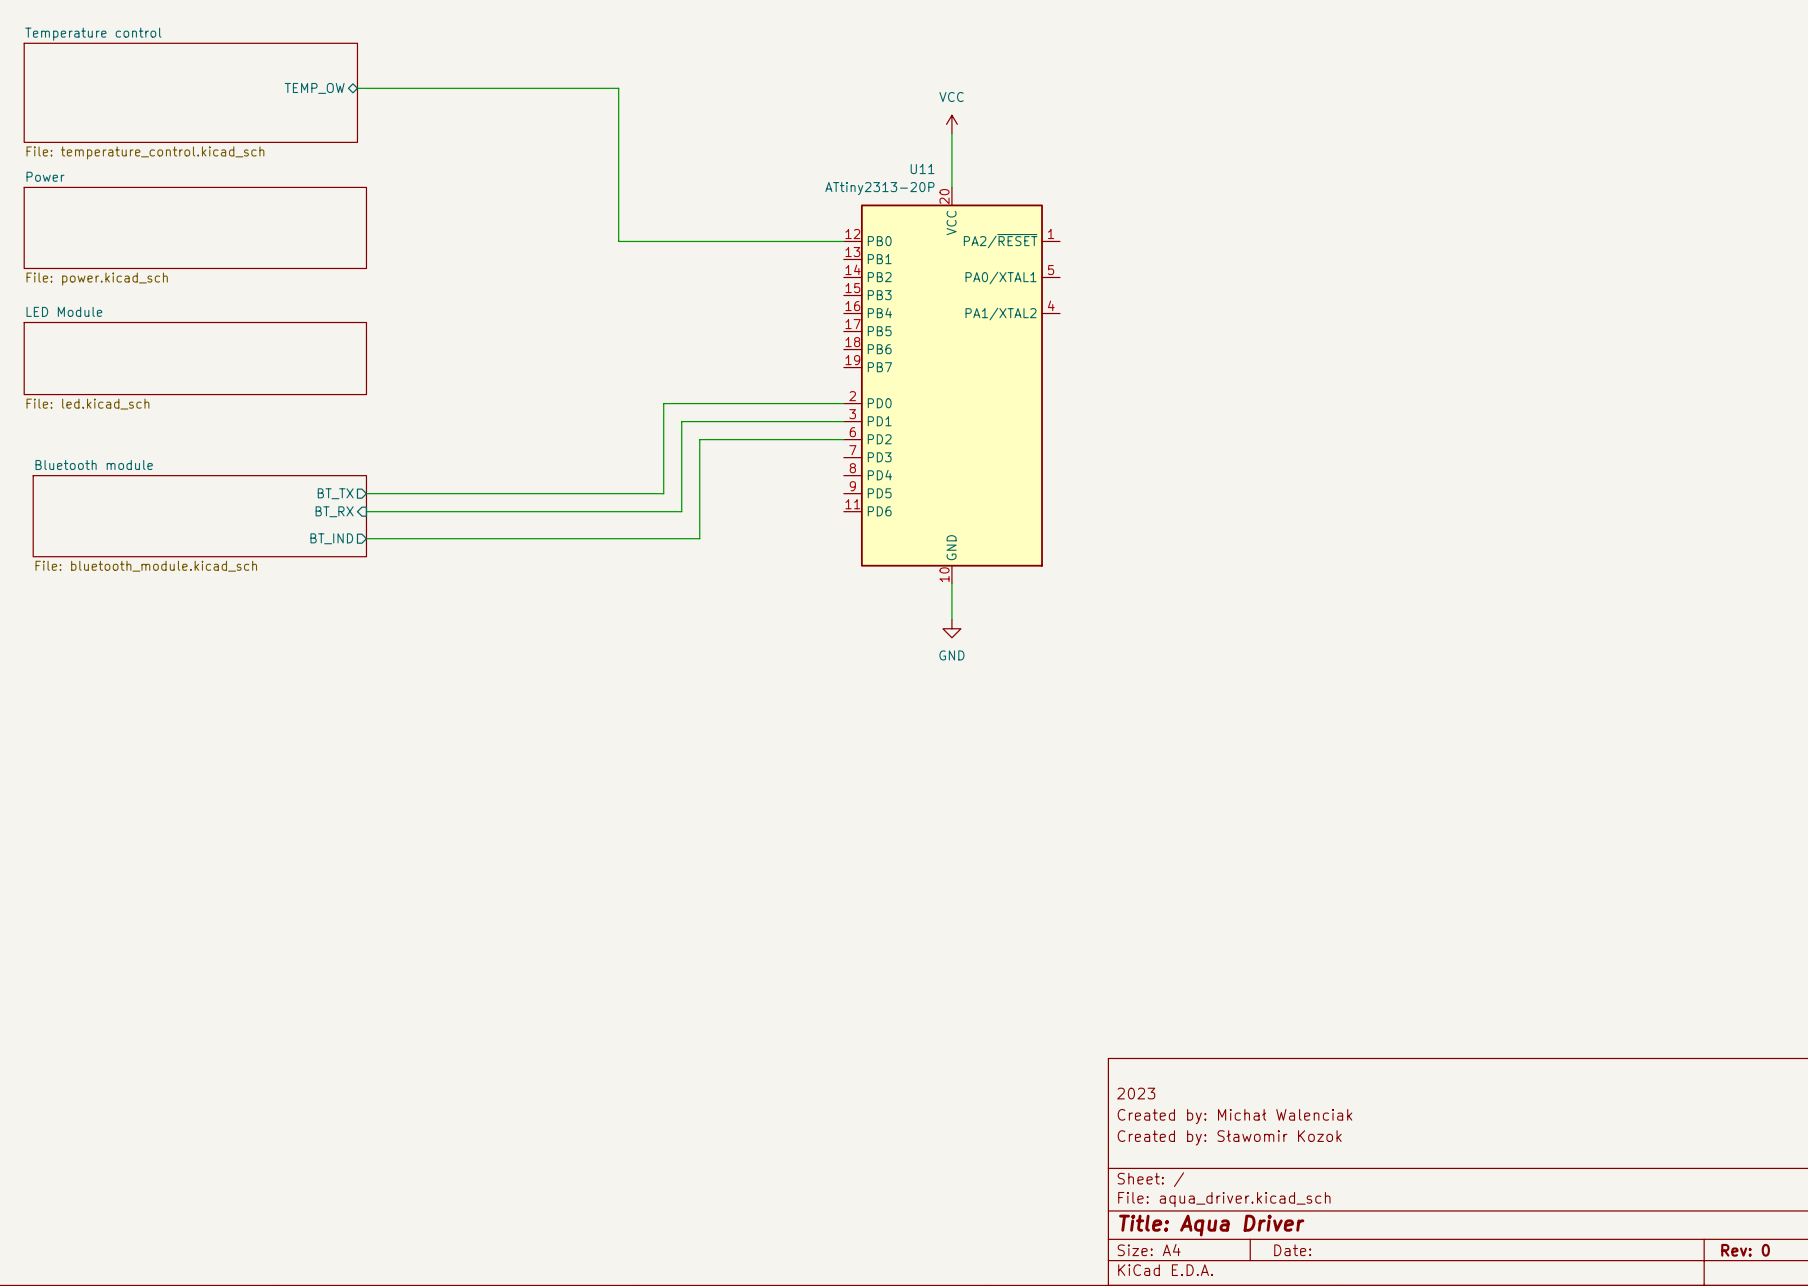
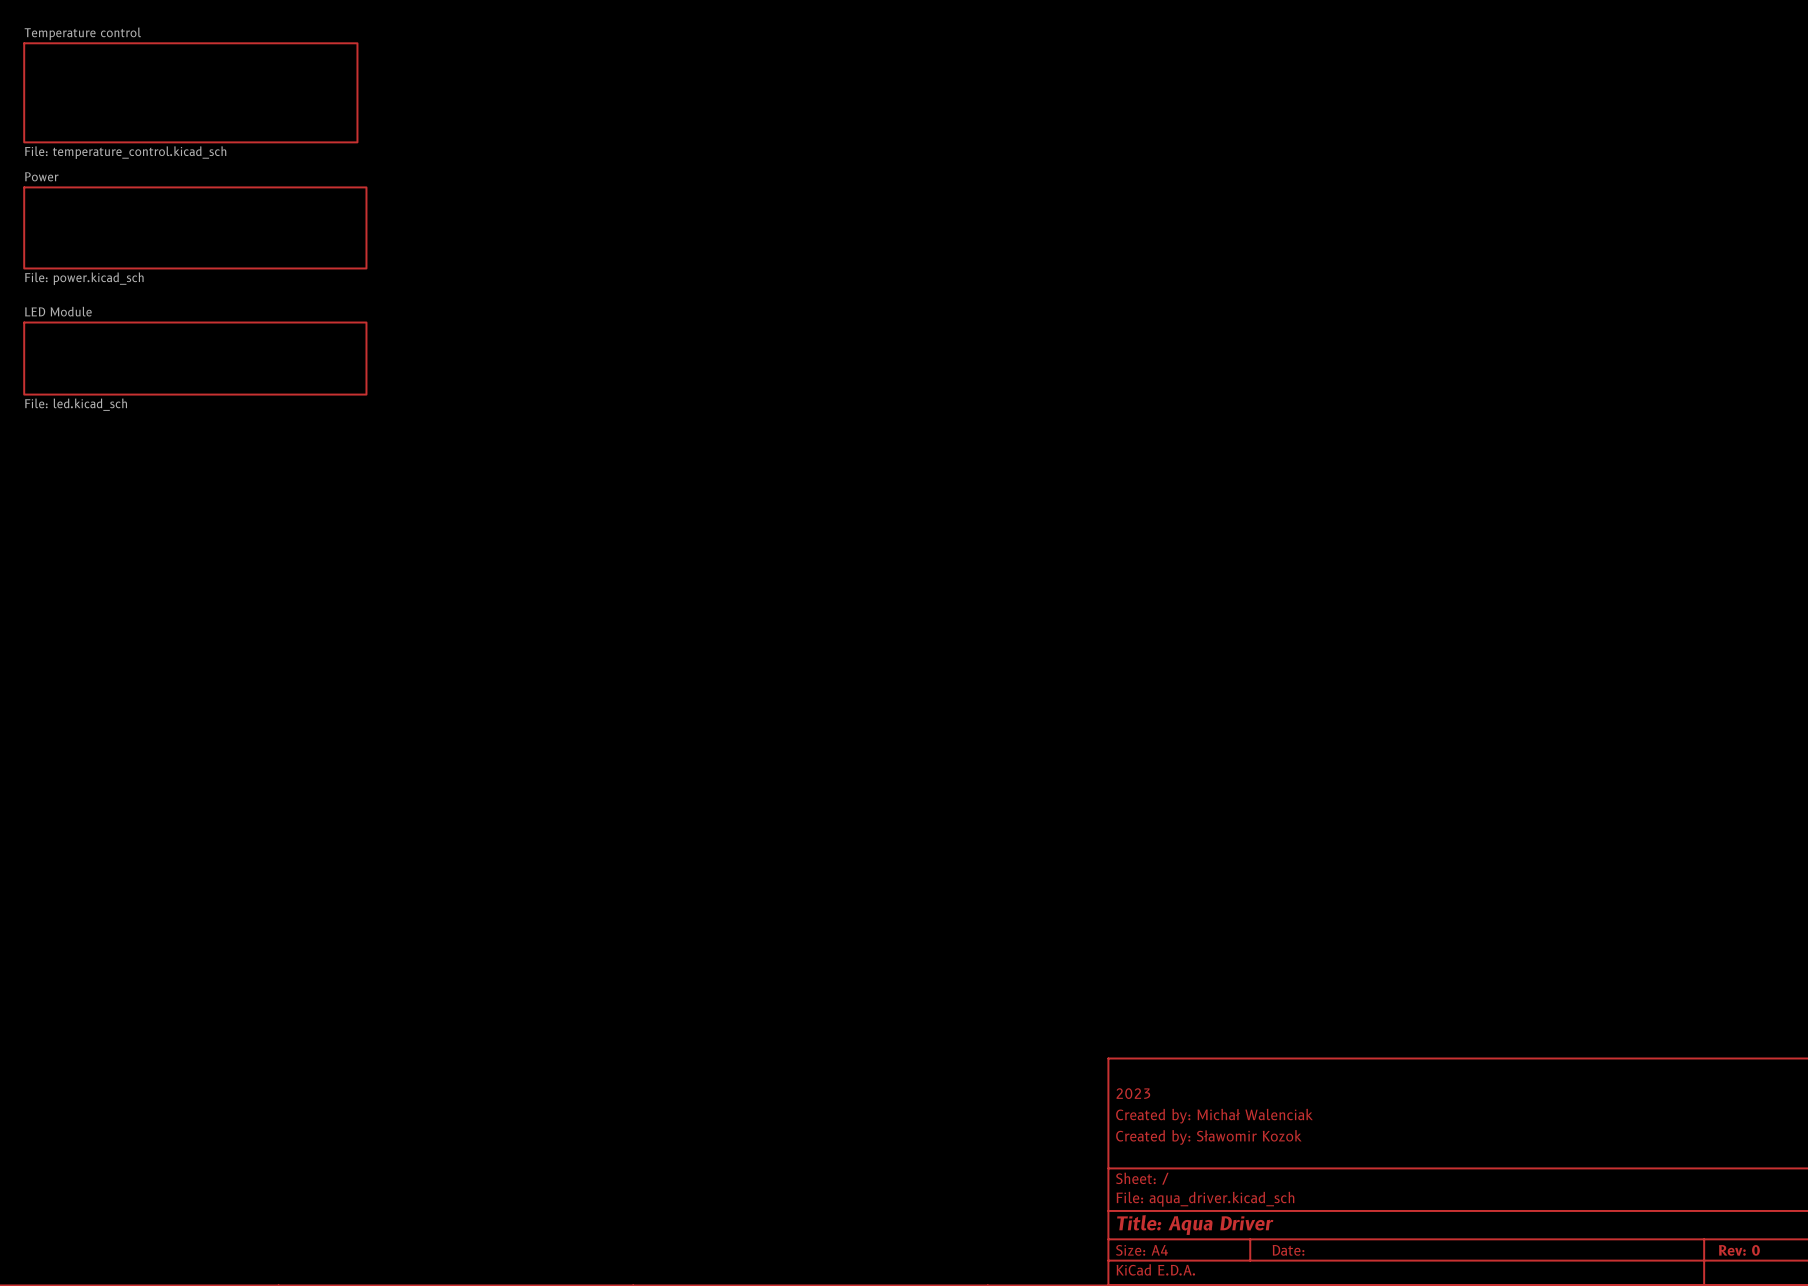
sheet pin: TEMP_OW (314, 88) -> none
wire: (357, 88) (618, 88) (618, 241) (843, 241) -> none
power symbol: VCC (951, 124) -> none
wire: (951, 133) (951, 187) -> none
U11: ATtiny2313-20P (951, 385) -> none
wire: (843, 403) (663, 403) (663, 493) (366, 493) -> none
wire: (843, 421) (681, 421) (681, 511) (366, 511) -> none
wire: (843, 439) (699, 439) (699, 538) (366, 538) -> none
sheet pin: BT_TX (335, 493) -> none
sheet pin: BT_RX (334, 511) -> none
sheet Bluetooth module: File: bluetooth_module.kicad_sch (199, 516) -> none
sheet pin: BT_IND (331, 538) -> none
wire: (951, 583) (951, 619) -> none
power symbol: GND (951, 628) -> none

